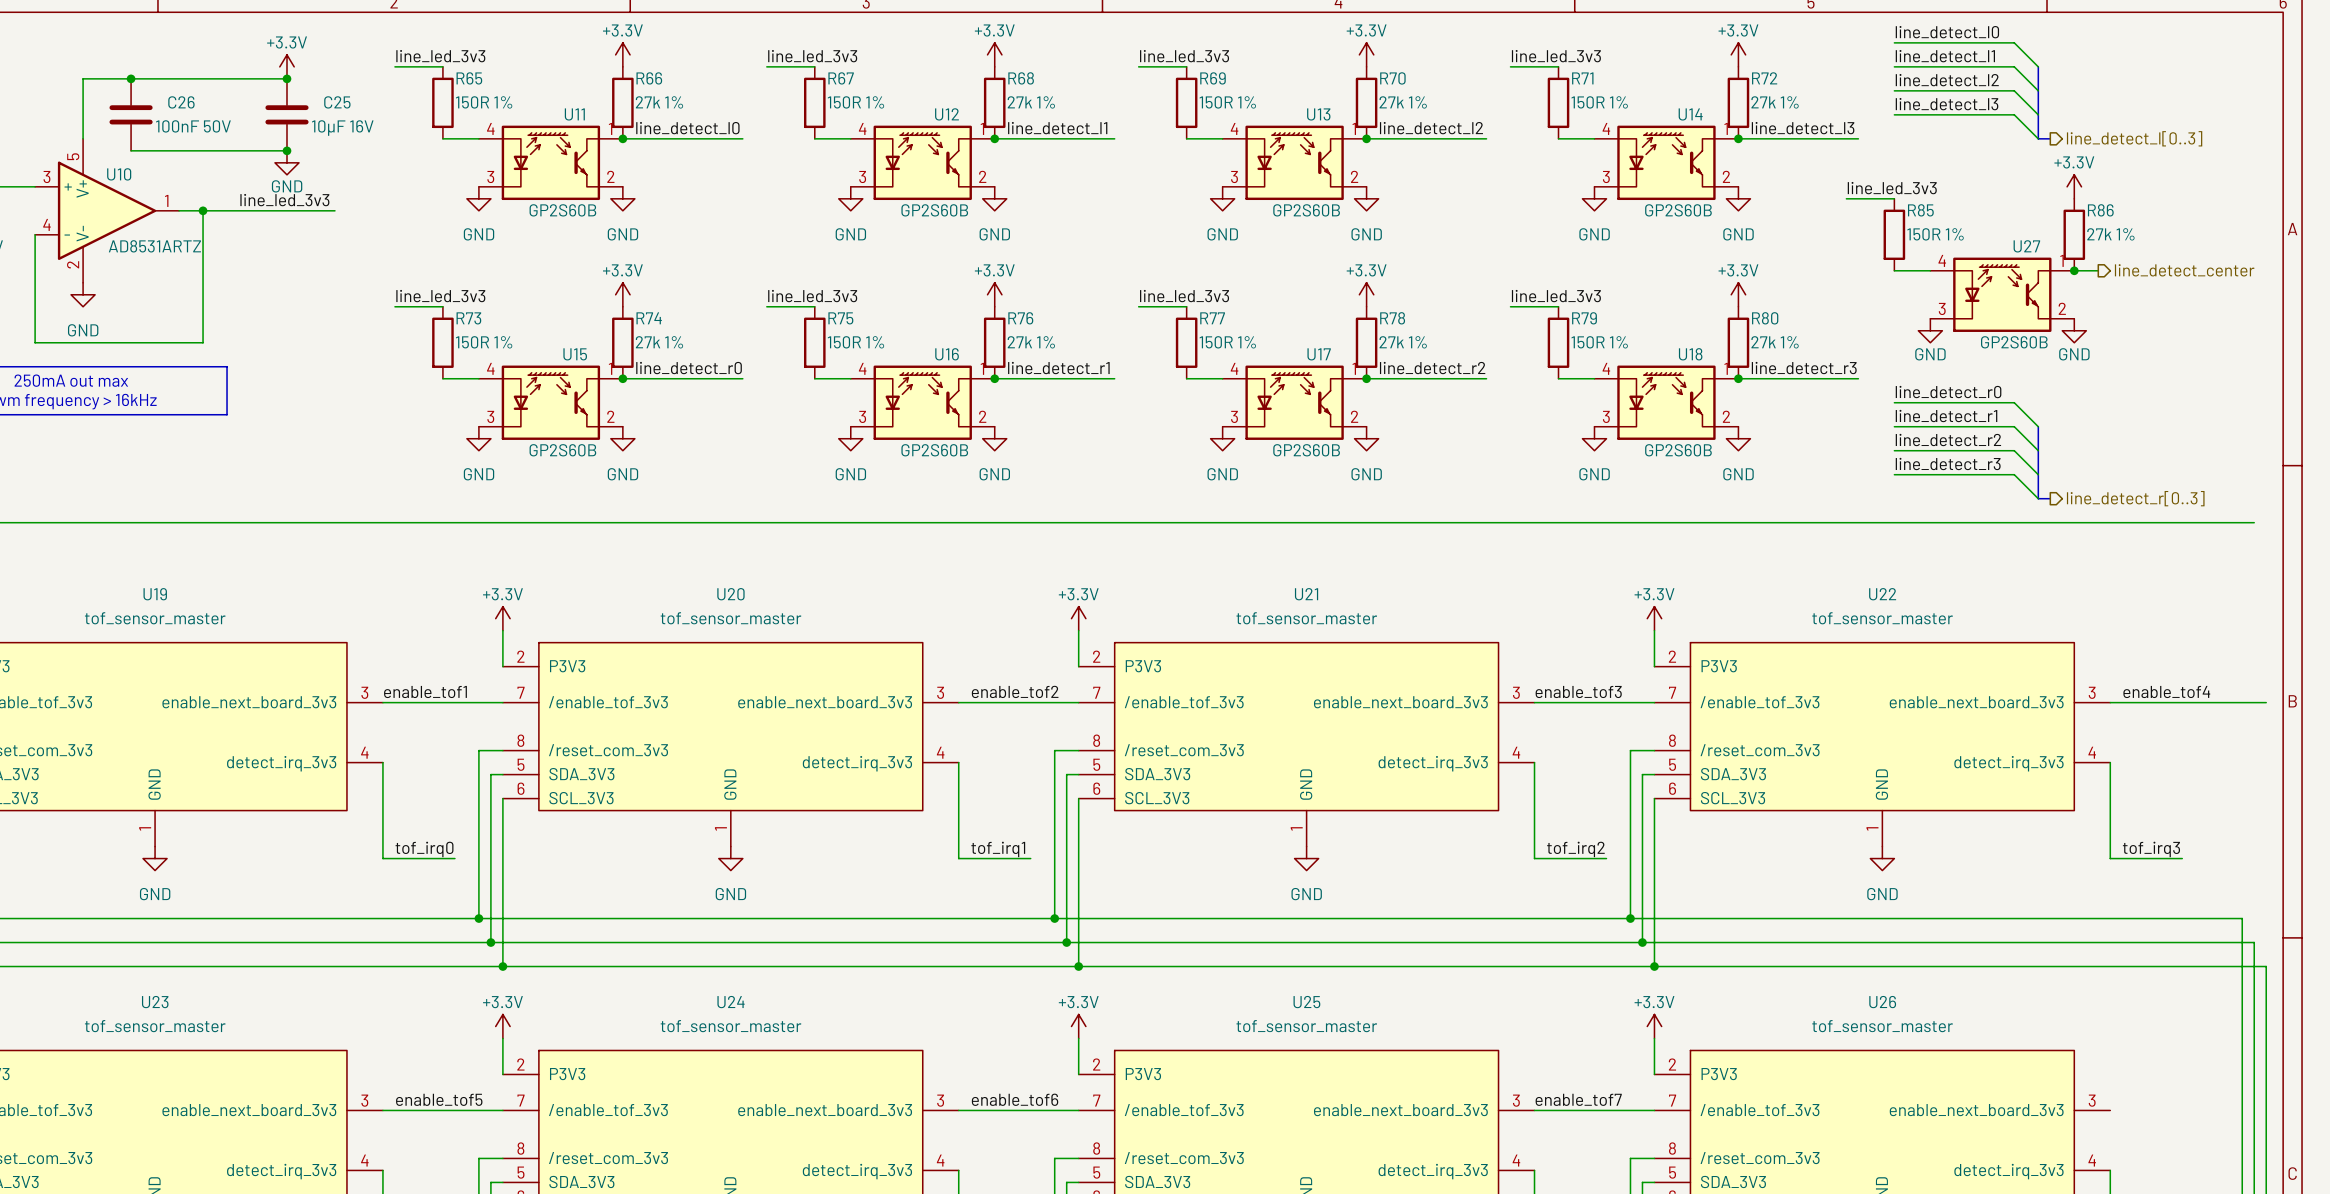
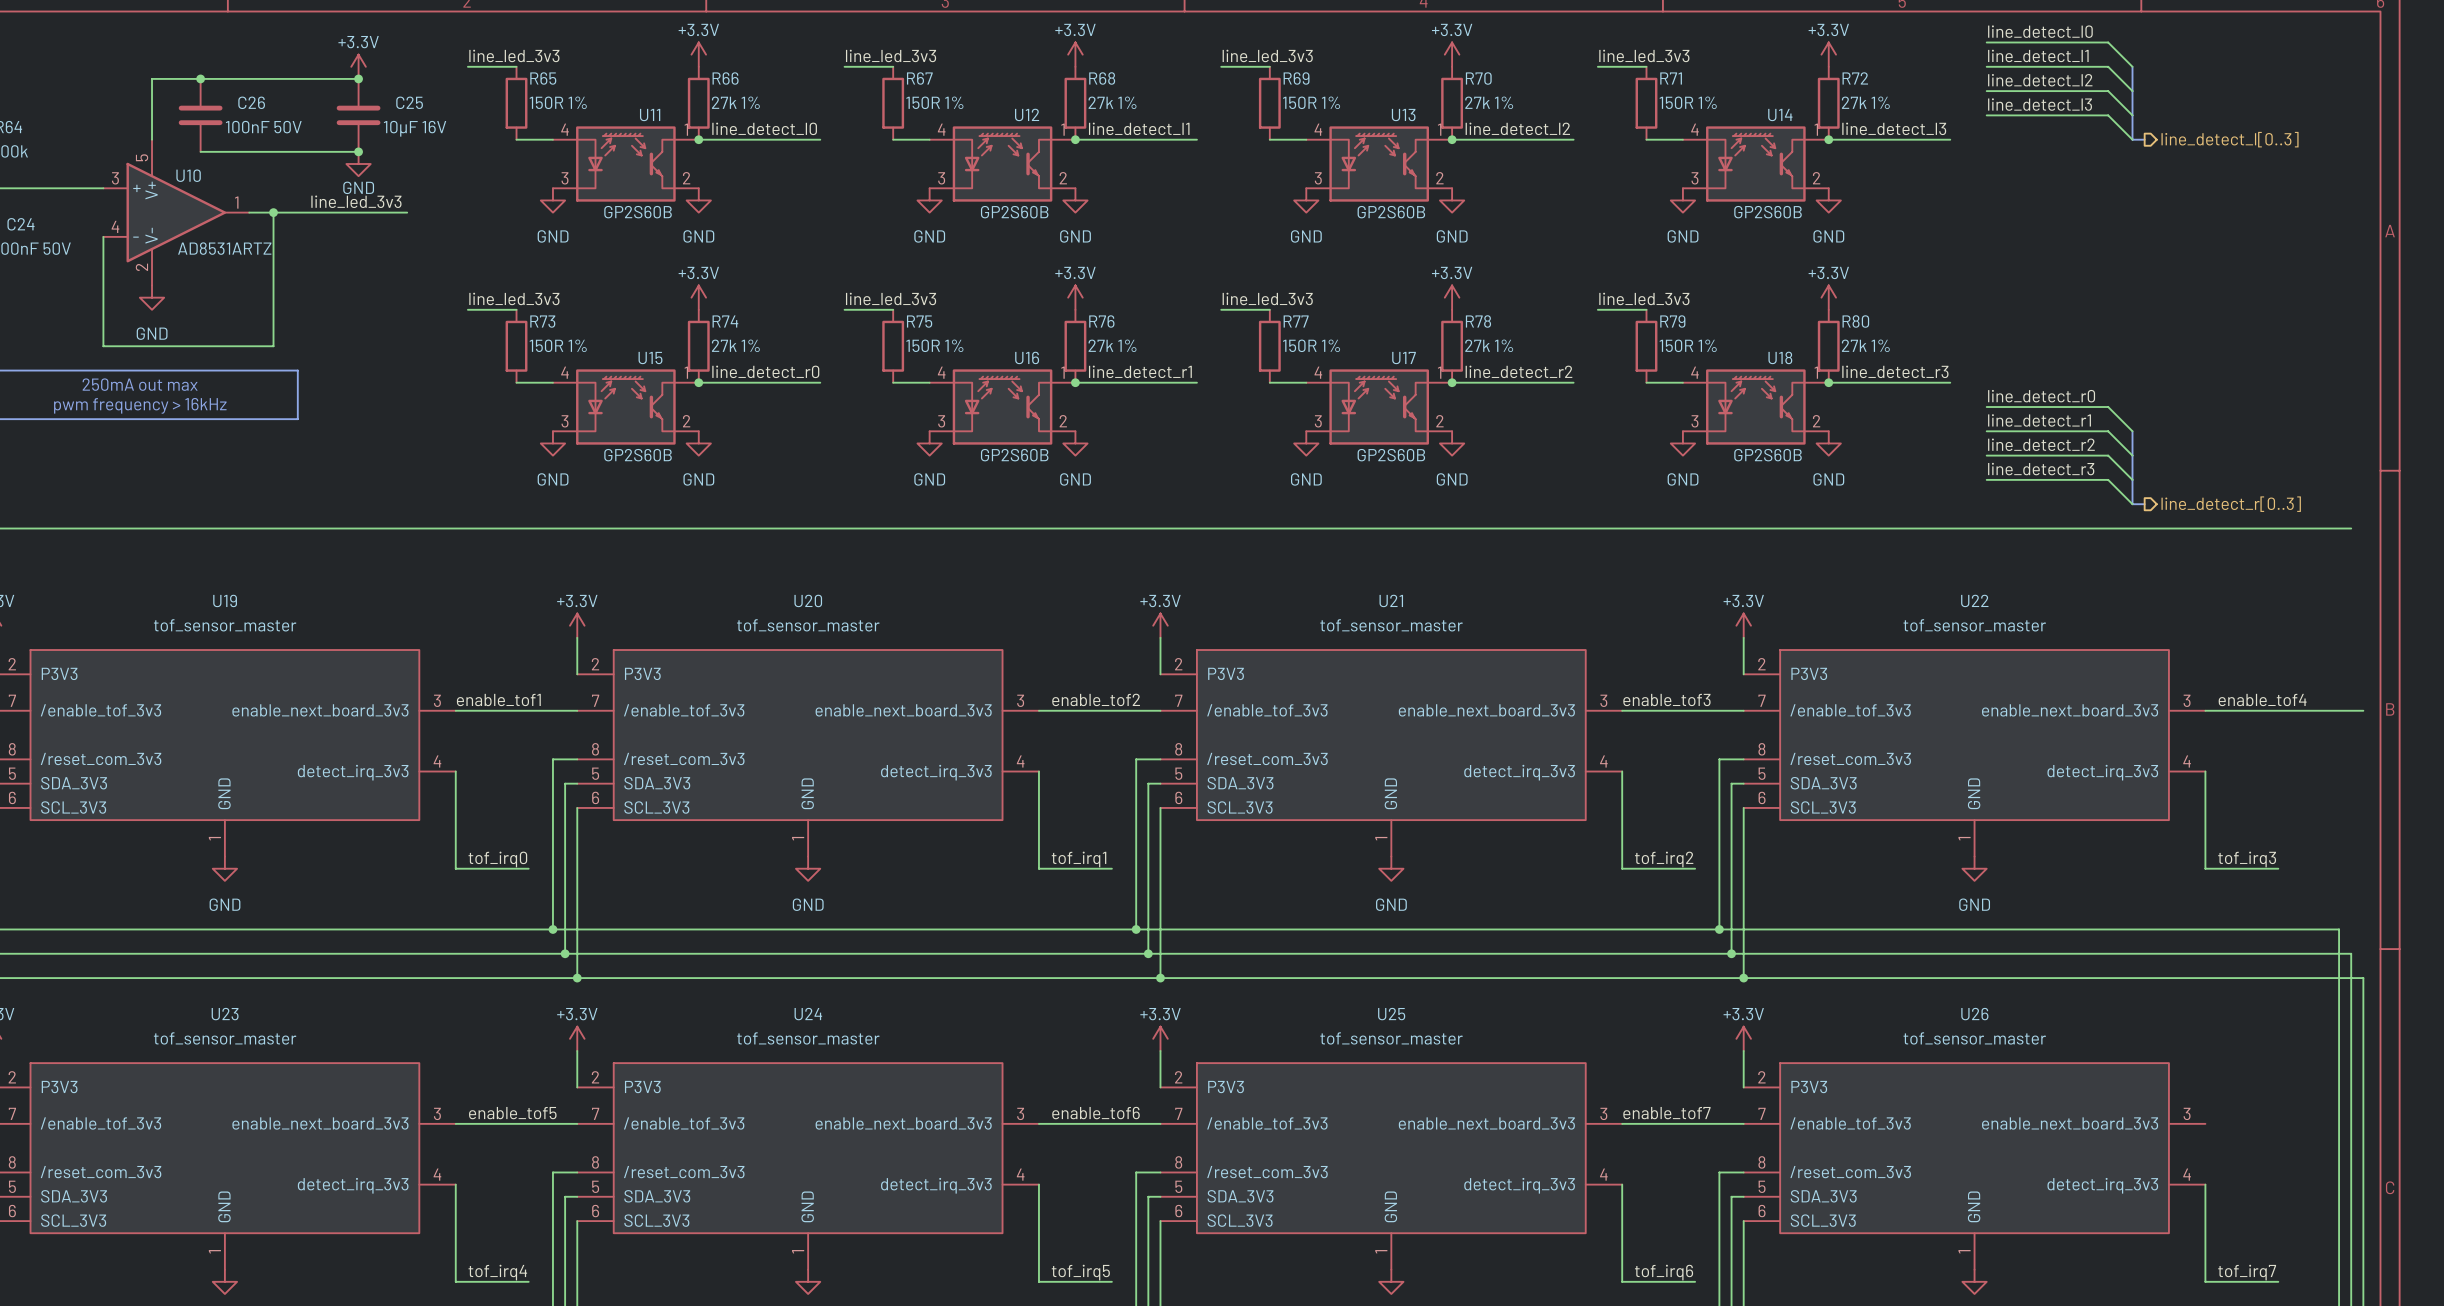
power symbol: +3.3V (2074, 186) -> none
label: line_led_3v3 (1892, 188) -> none
wire: (1846, 198) (1894, 198) -> none
R85: 150R 1% (1894, 234) -> none
R86: 27k 1% (2074, 234) -> none
wire: (1894, 270) (1930, 270) -> none
wire: (2074, 270) (2098, 270) -> none
junction: (2074, 270) -> none
hierarchical label: line_detect_center (2184, 270) -> none
U27: GP2S60B (2002, 294) -> none
power symbol: GND (1930, 330) -> none
power symbol: GND (2074, 330) -> none

